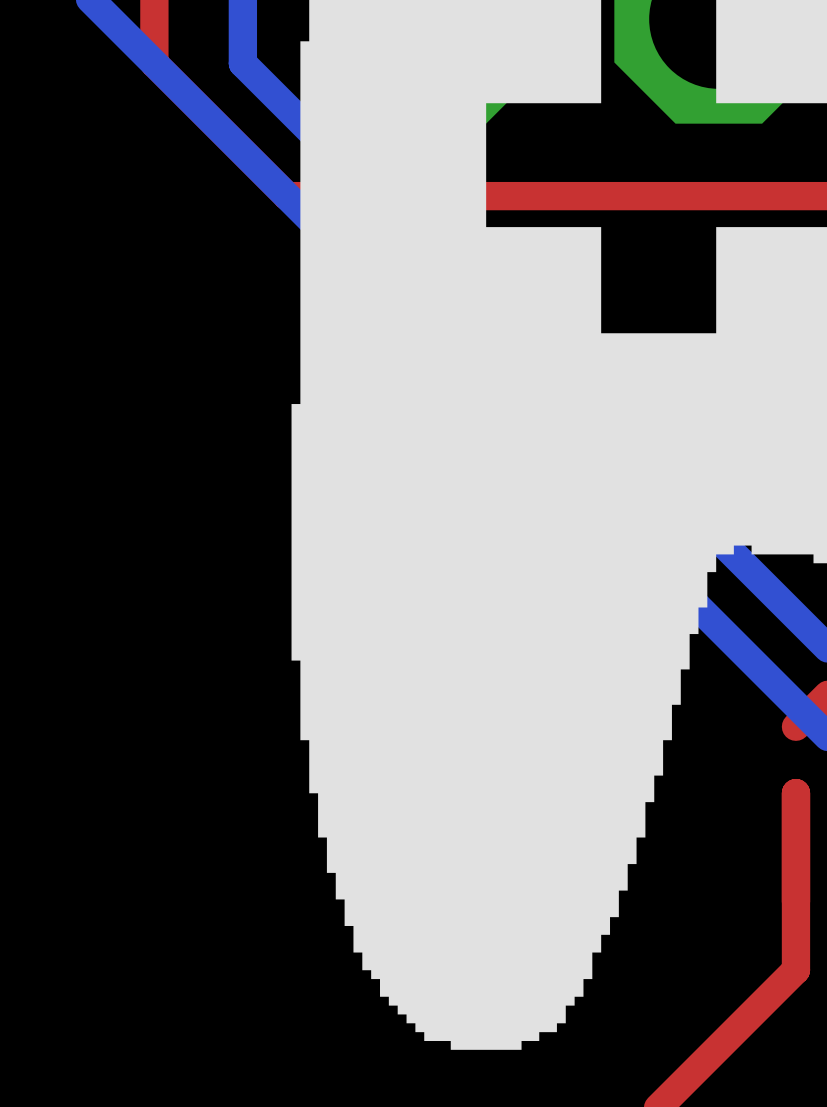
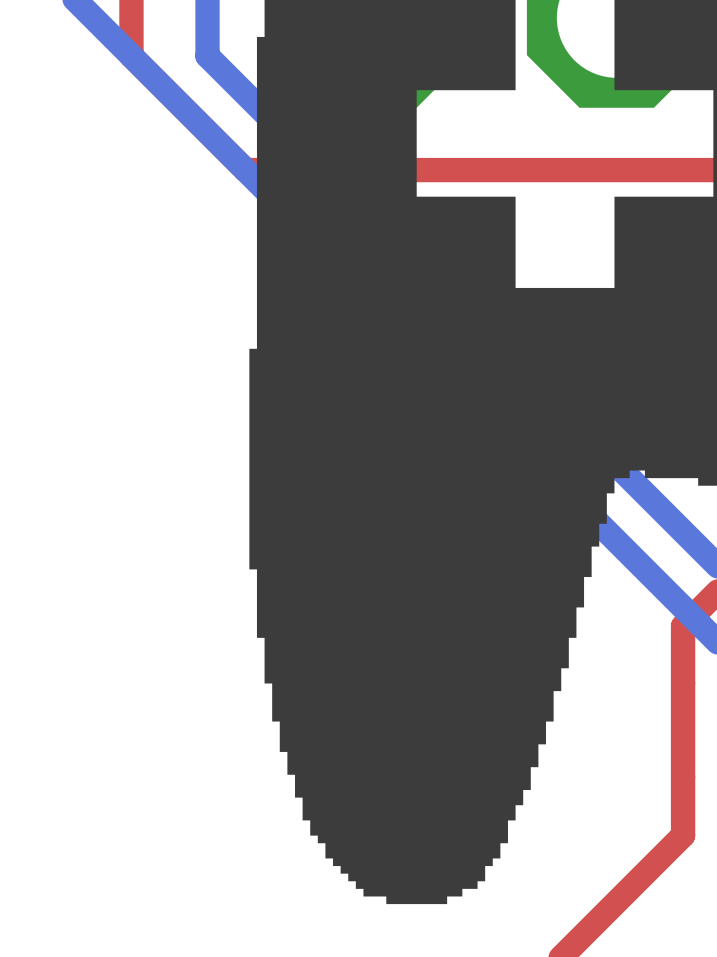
top track: none -> (683, 626) (683, 683)

